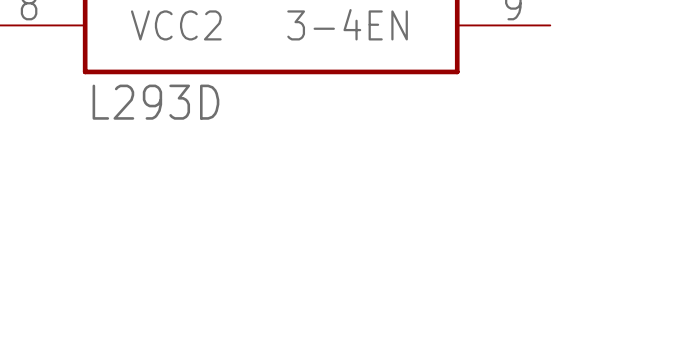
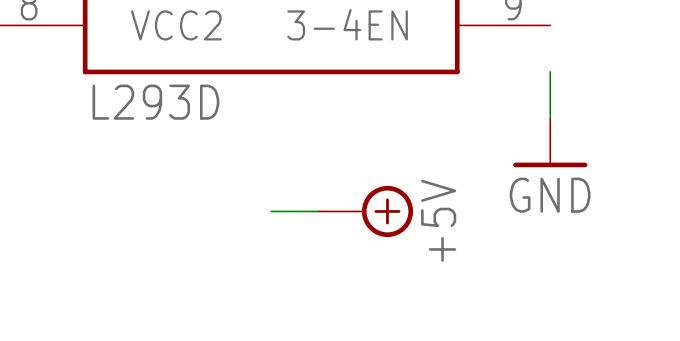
wire: none -> (550, 71) (550, 118)
power symbol: none -> GND (550, 142)
wire: none -> (271, 211) (317, 211)
power symbol: none -> +5V (365, 211)

